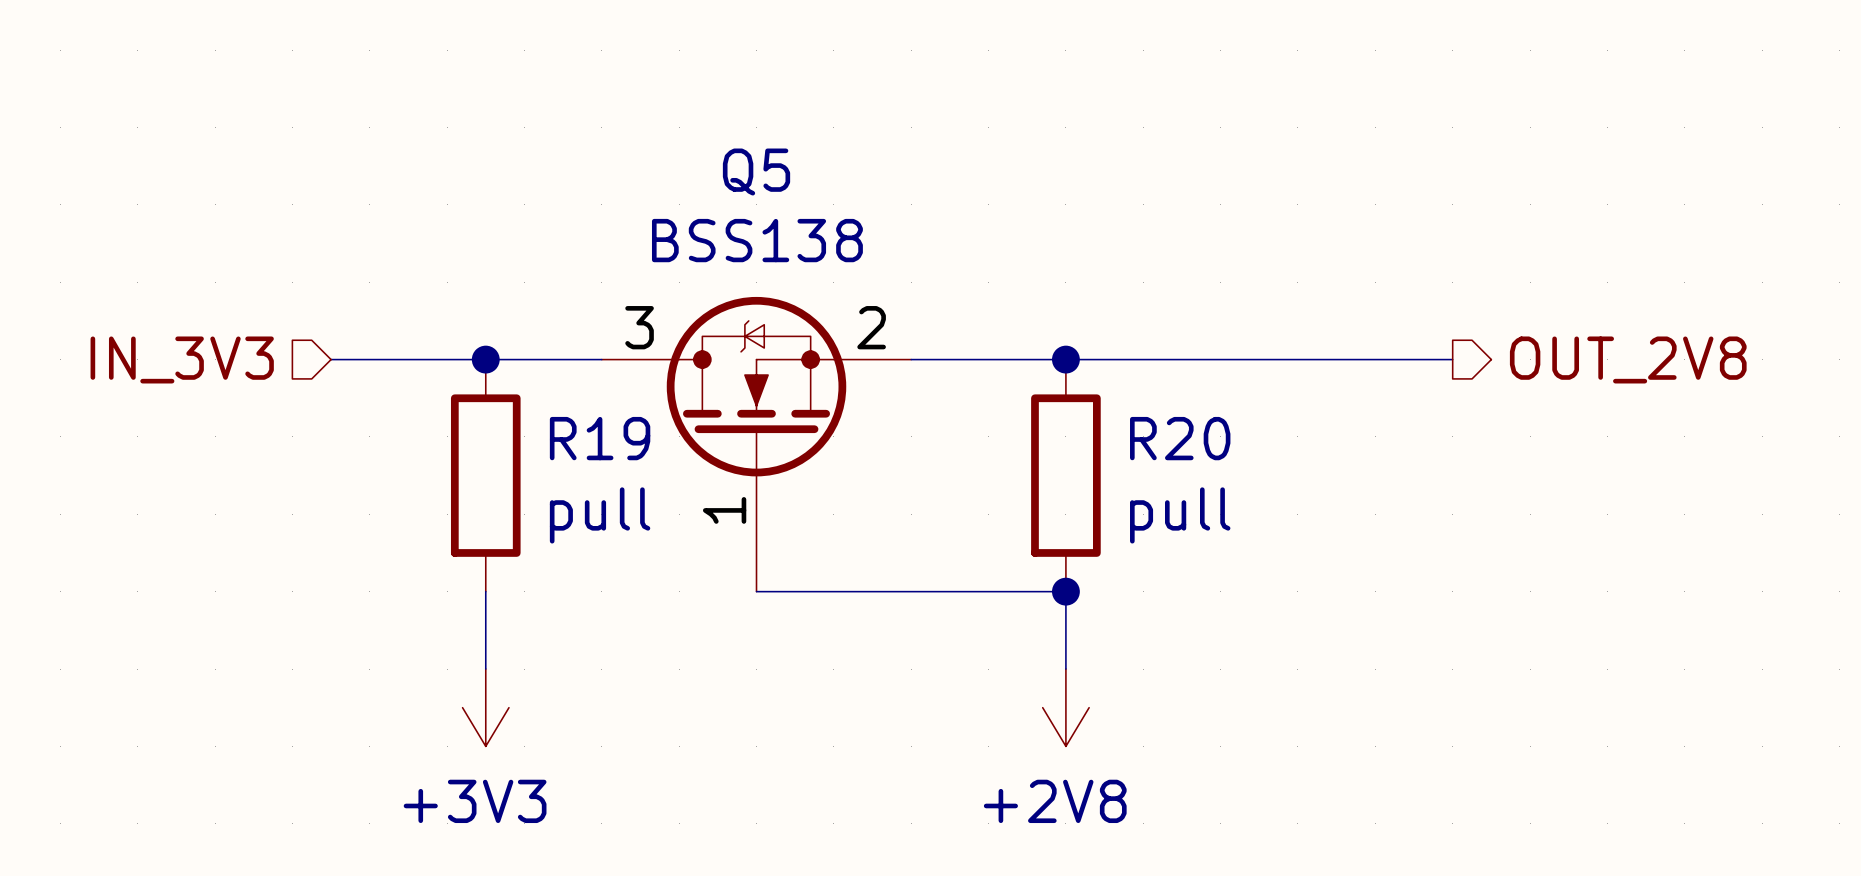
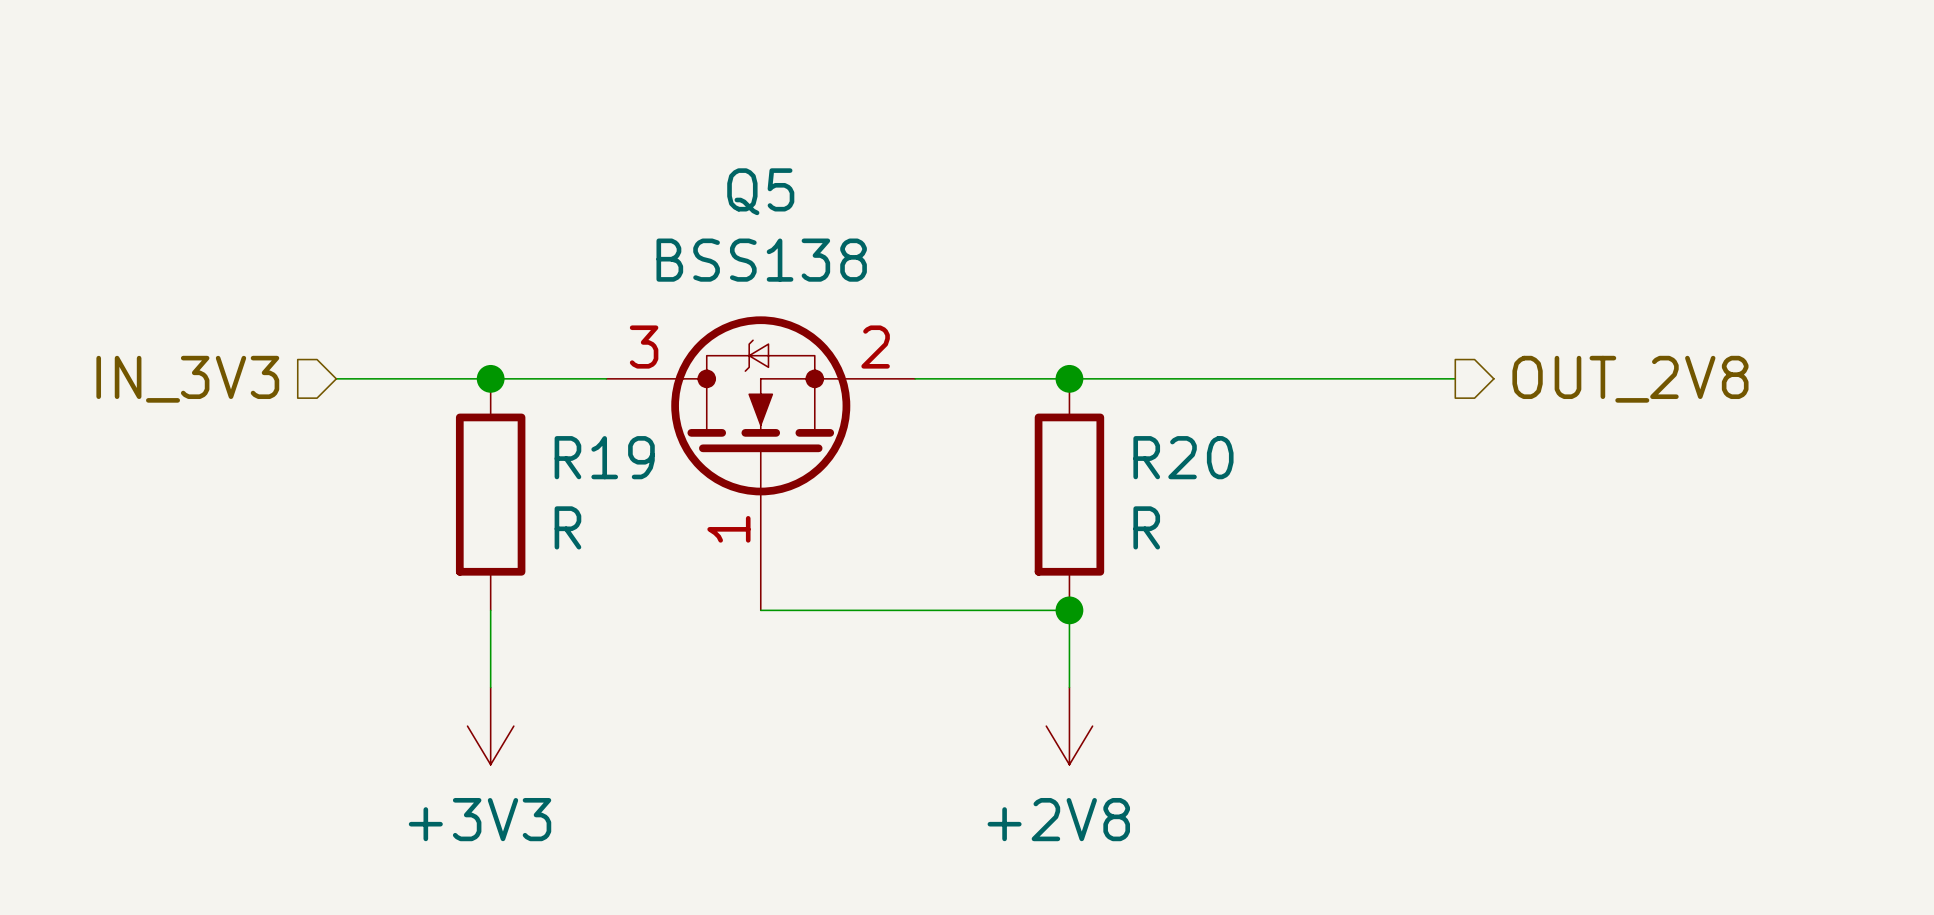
R19 value: pull (600, 515) -> R (567, 527)
R20 value: pull (1180, 515) -> R (1146, 527)

